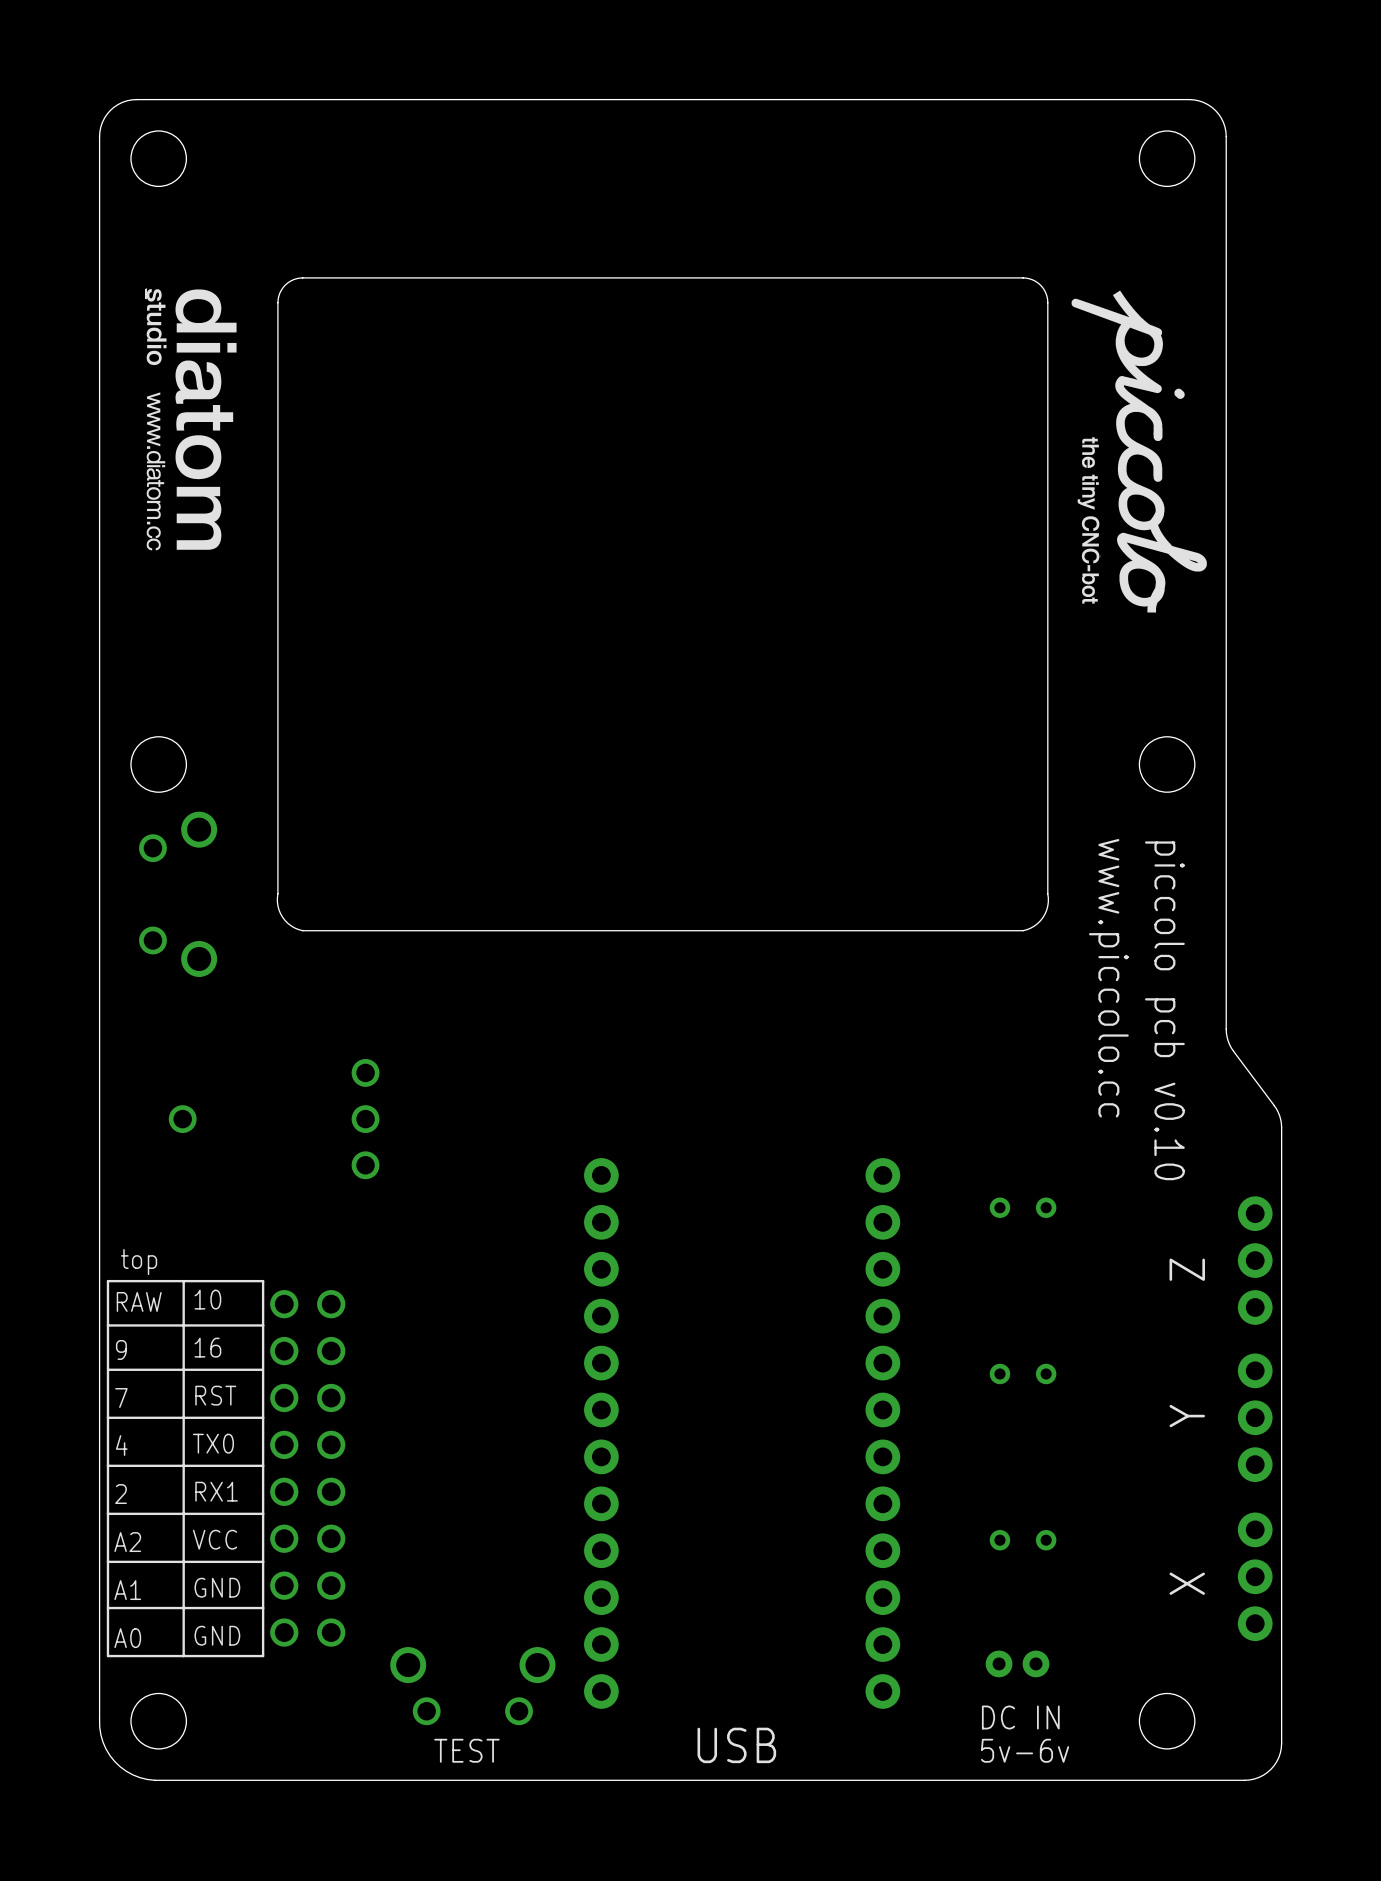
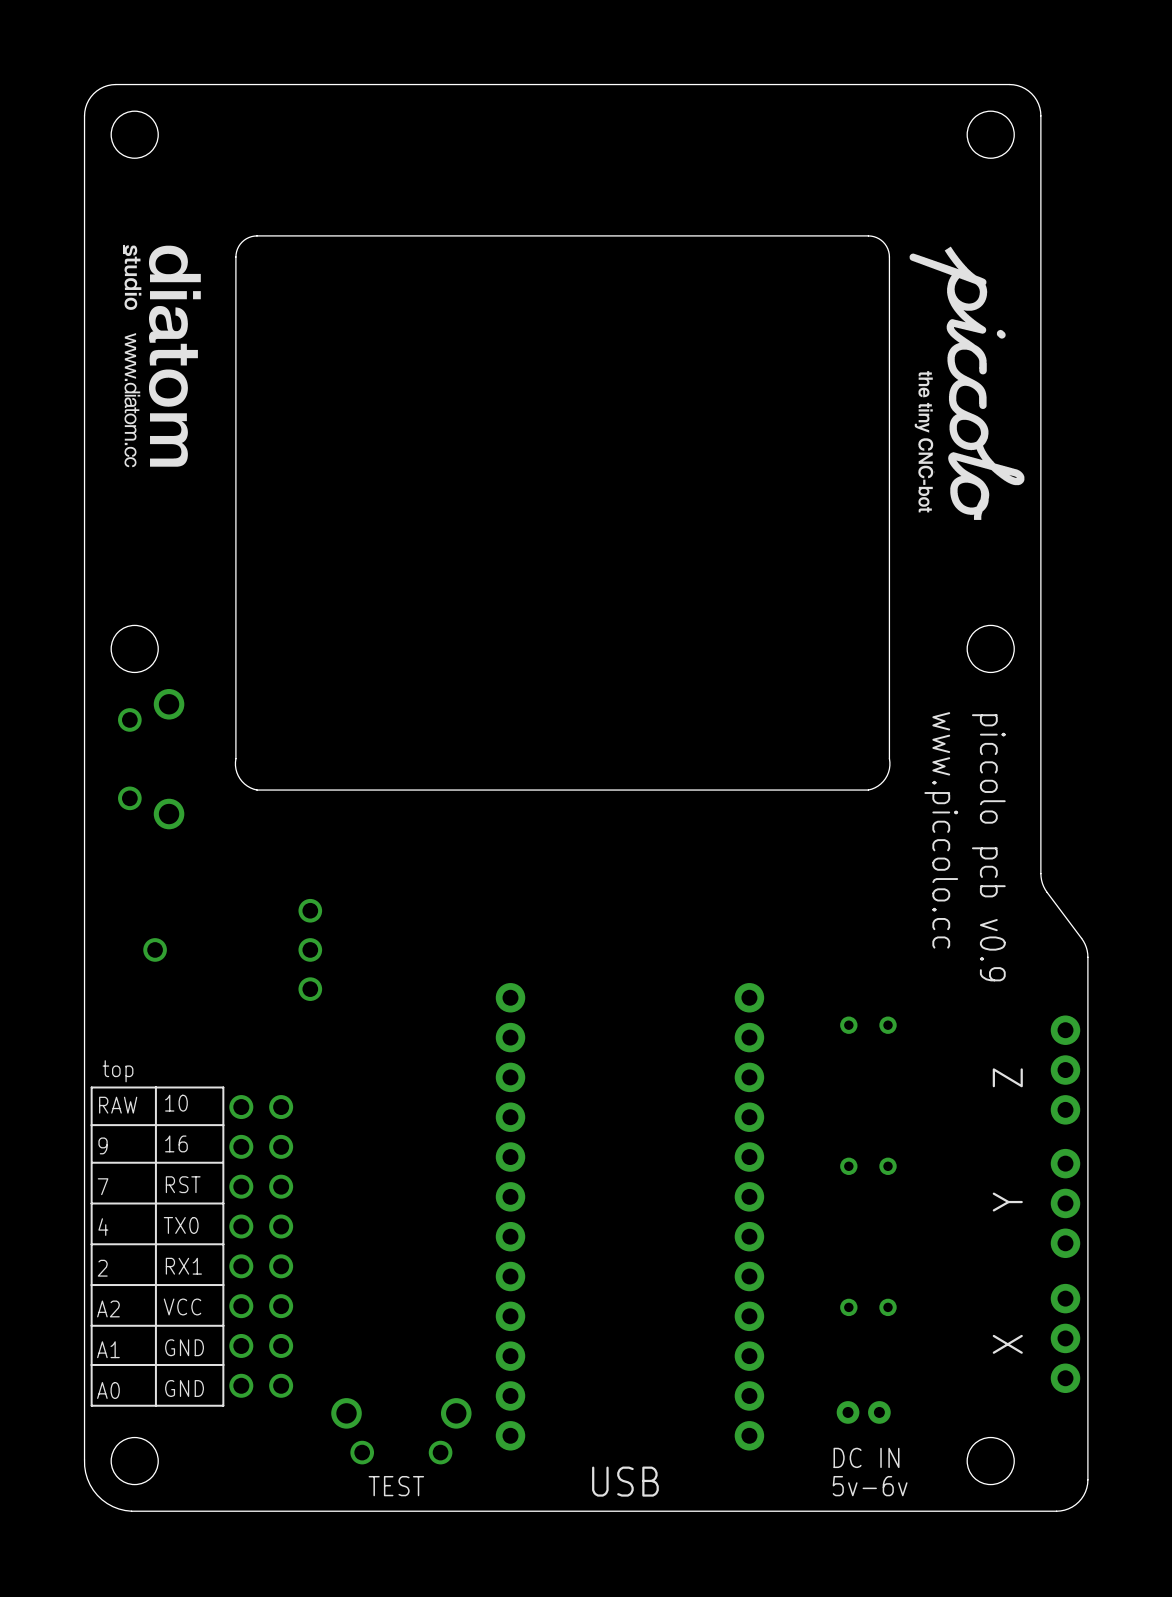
text: piccolo pcb v0.10 (1164, 1010) -> piccolo pcb v0.9 (988, 847)

